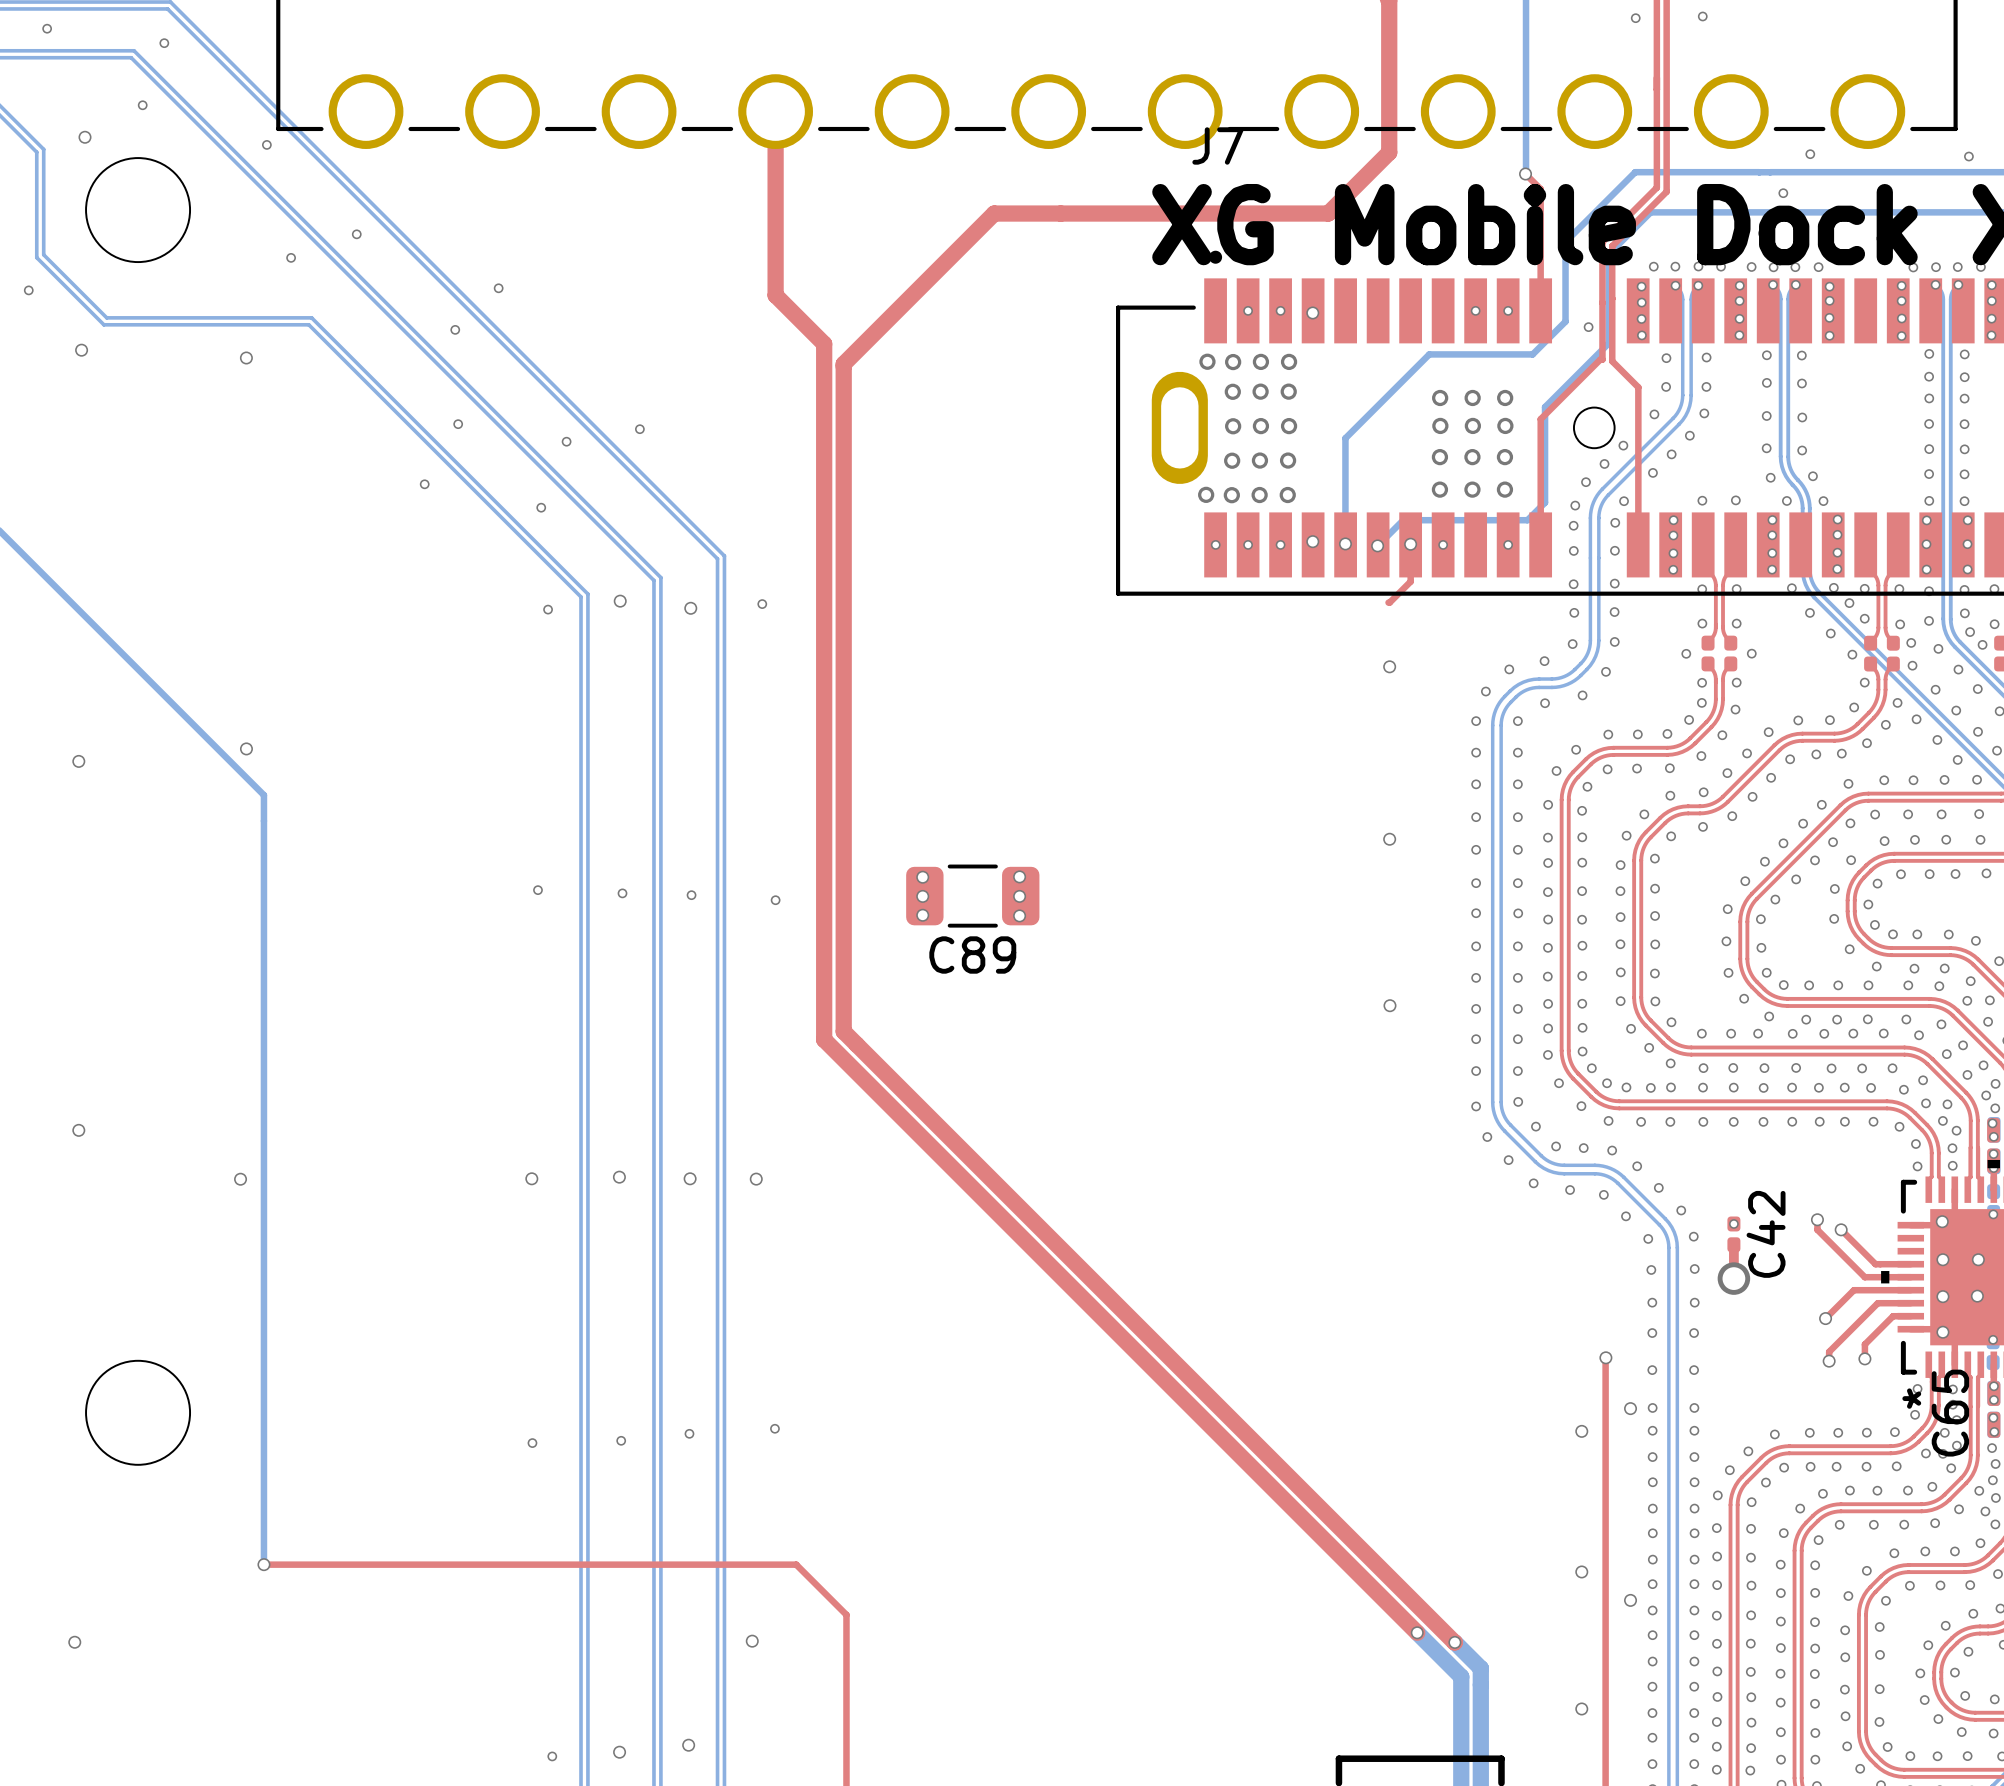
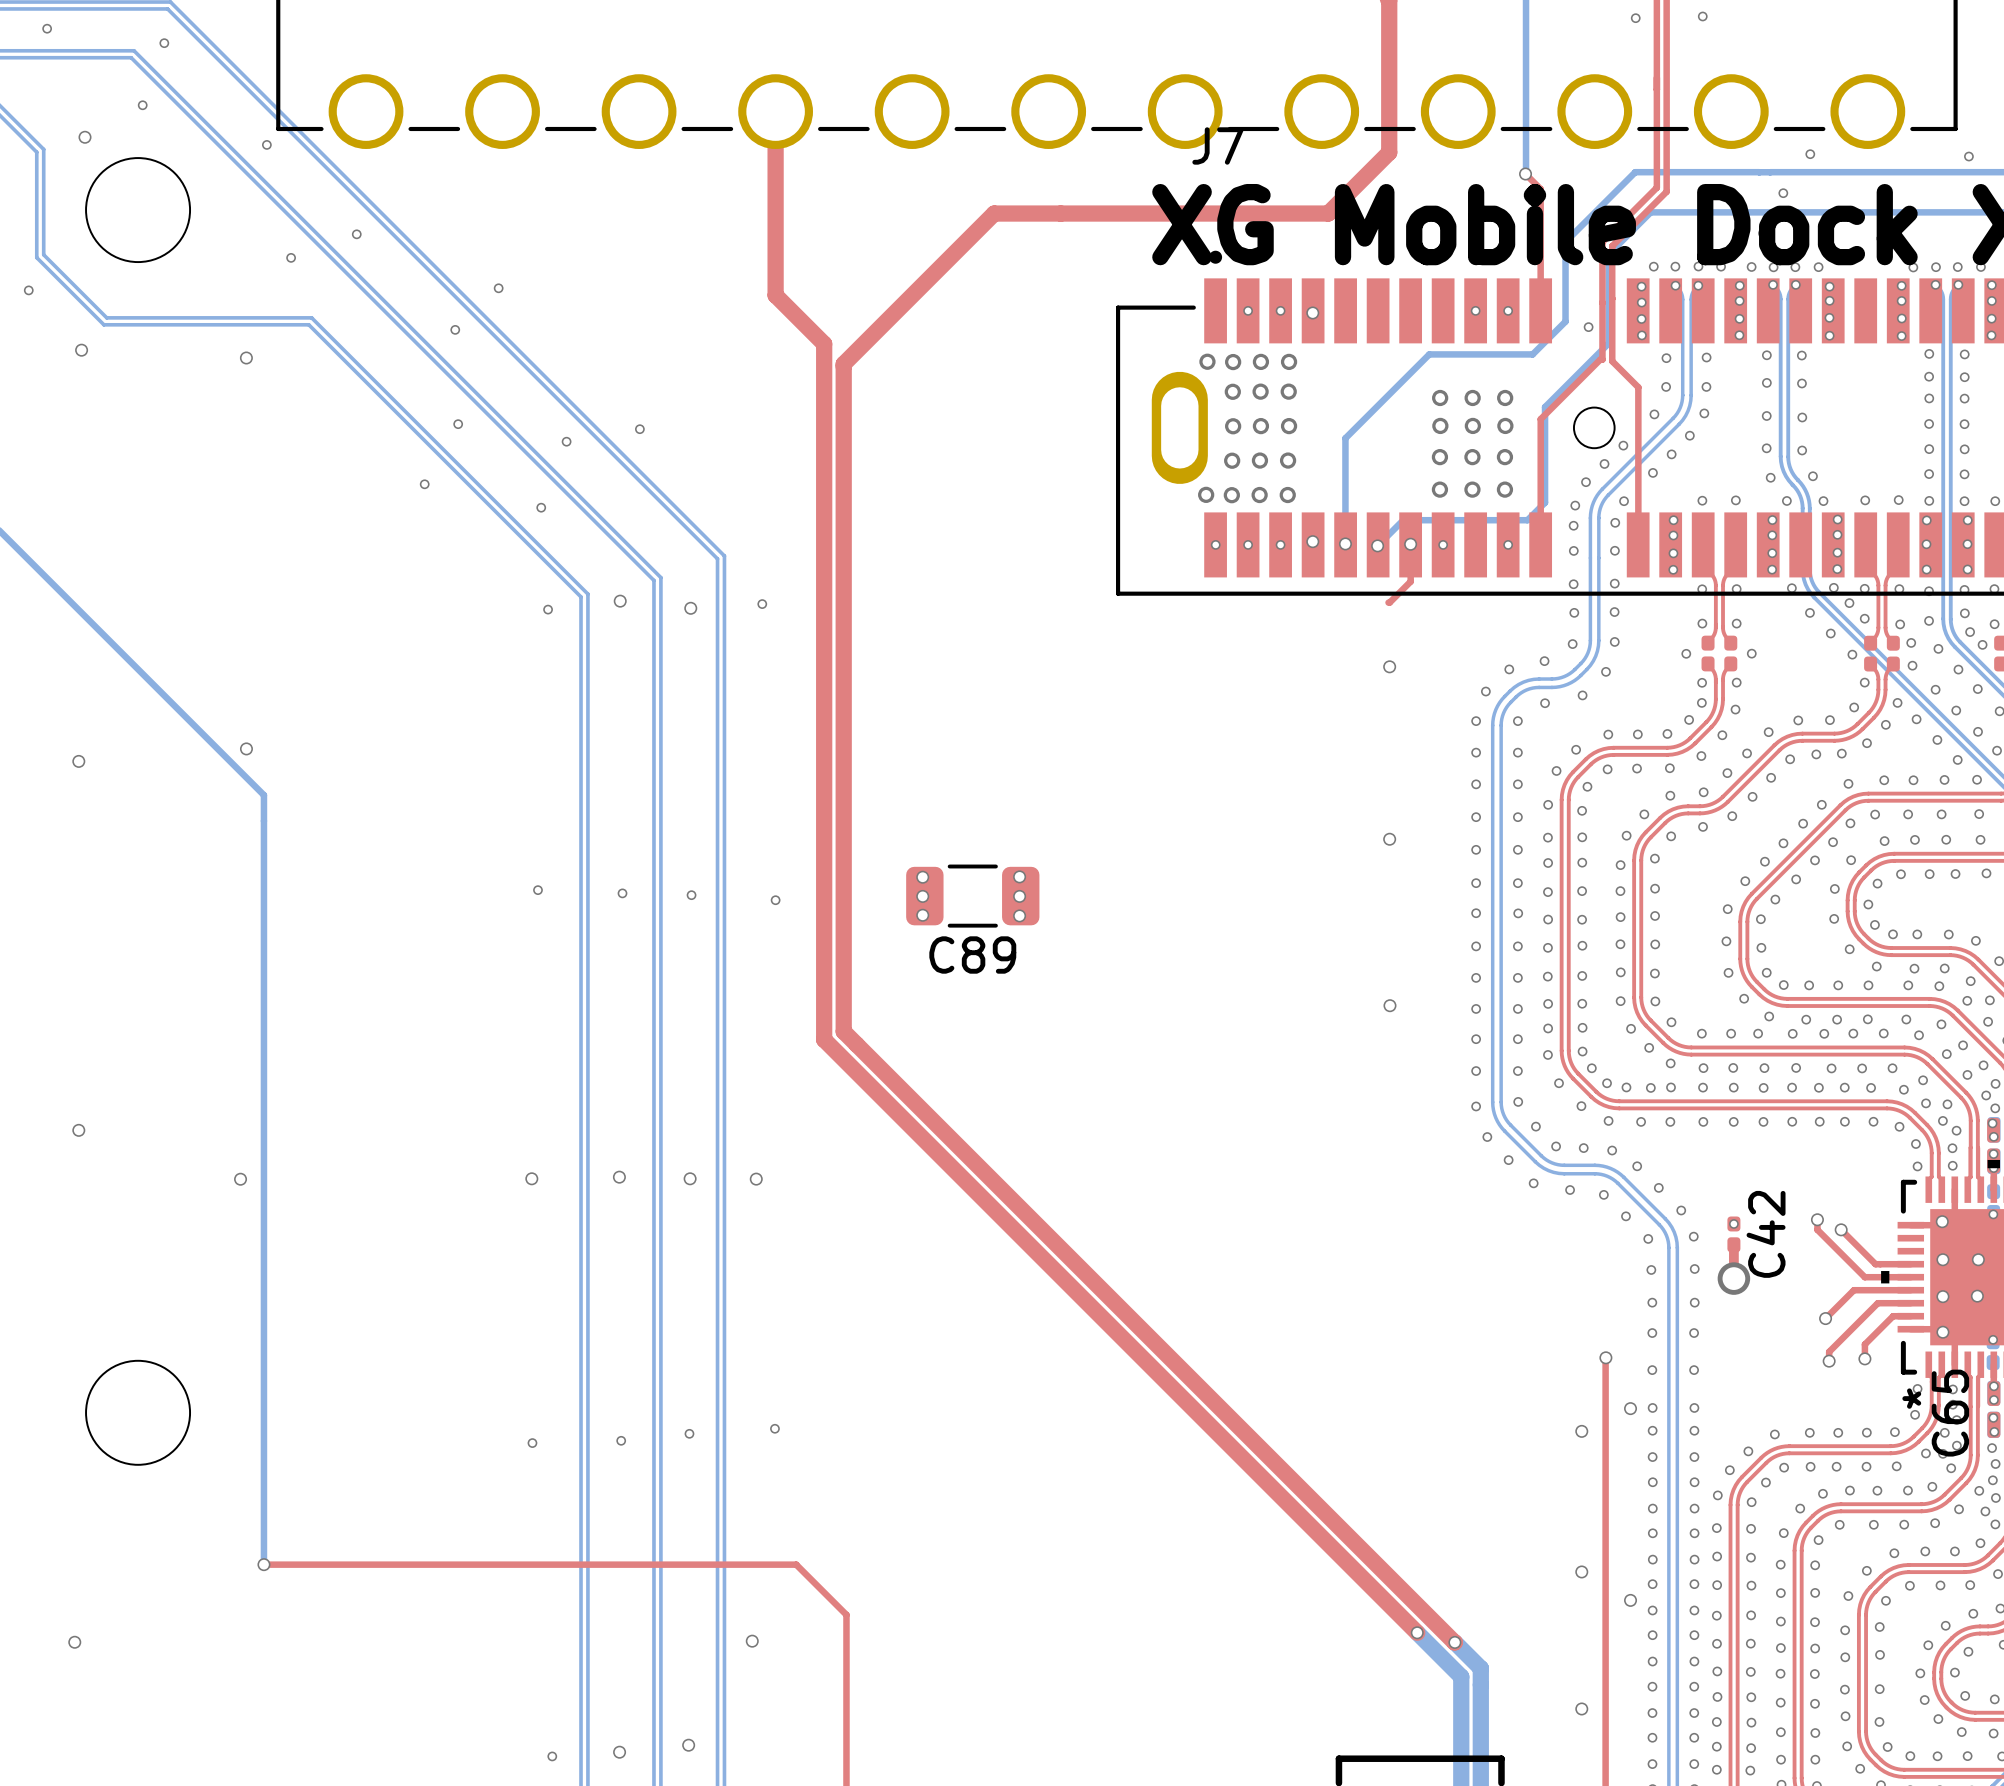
via: none -> (1865, 500)
via: none -> (1898, 500)
via: none -> (1995, 501)

